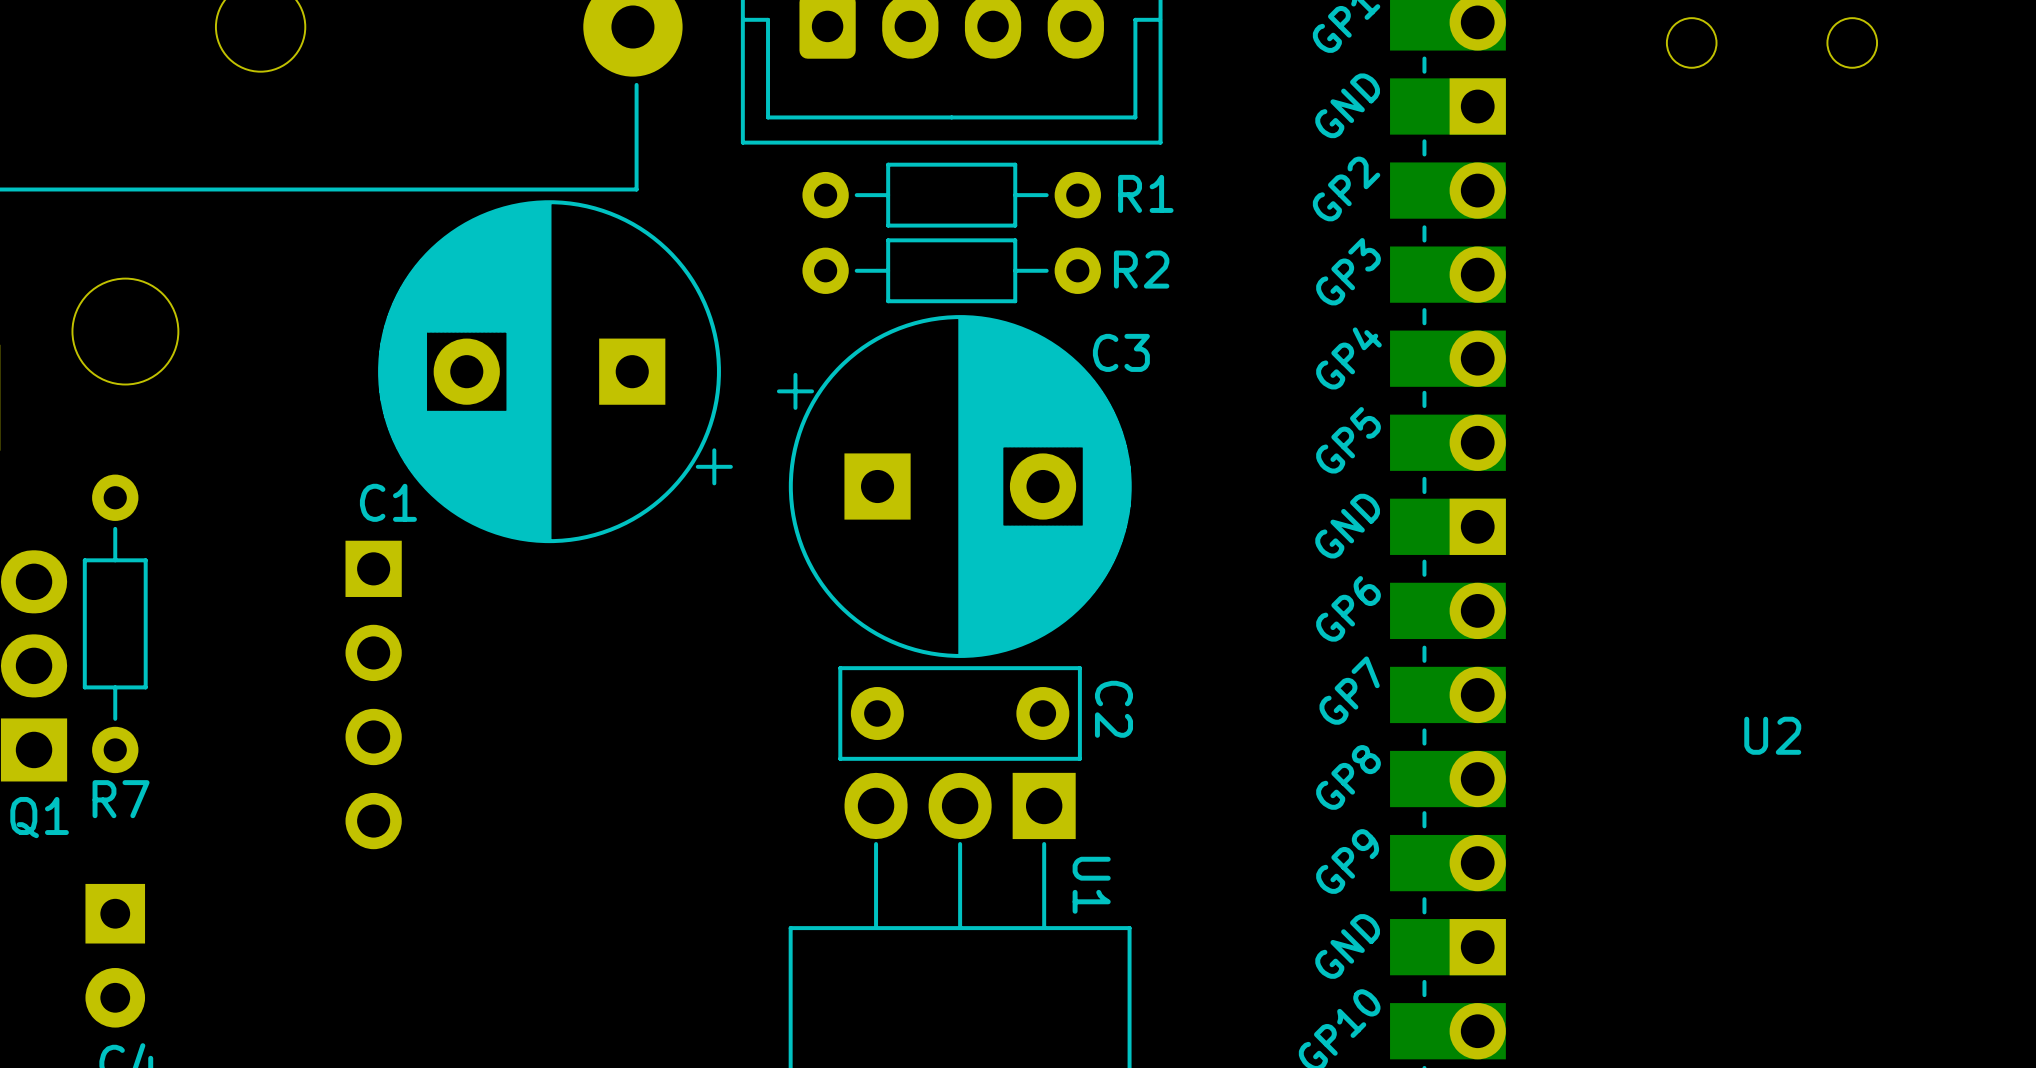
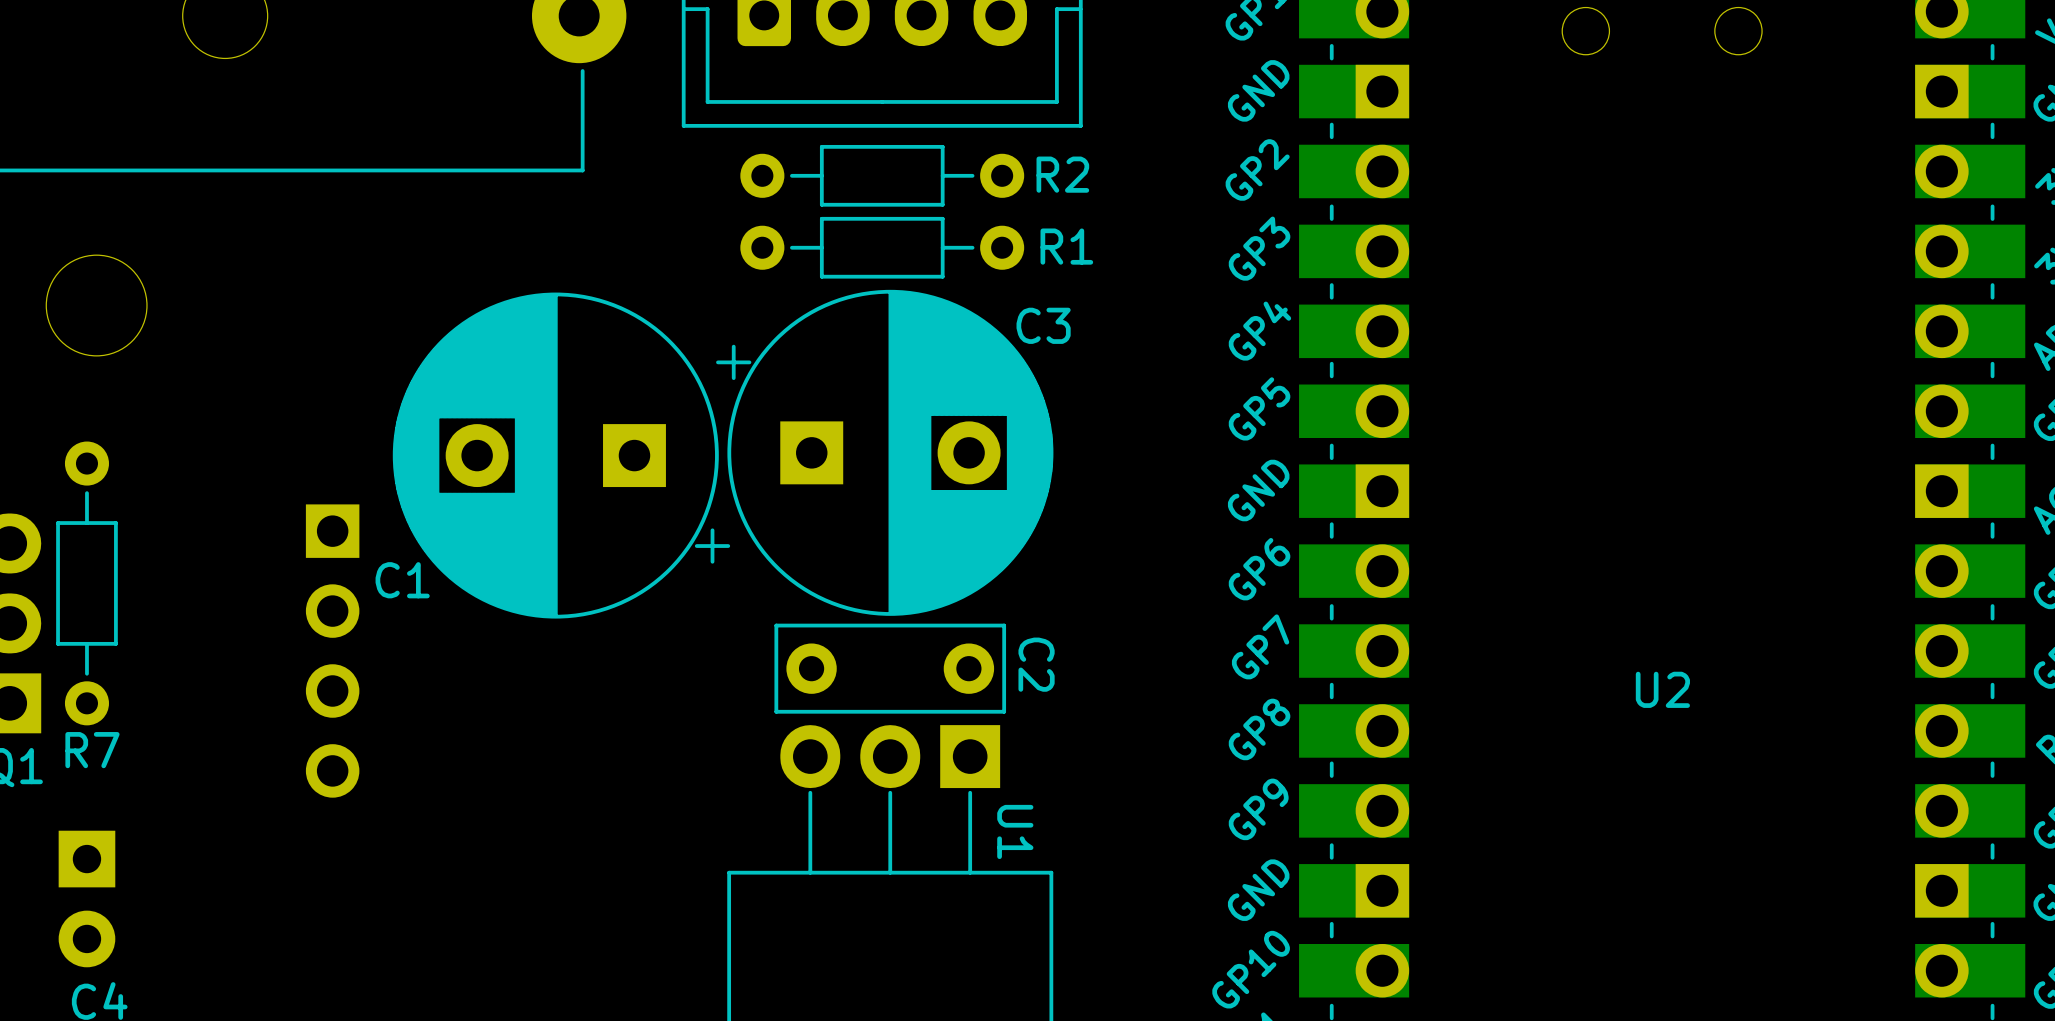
R1 name: R1 (1145, 193) -> R2 (1062, 174)
R2 name: R2 (1141, 269) -> R1 (1066, 246)
C1 position: (555, 371) -> (561, 455)

